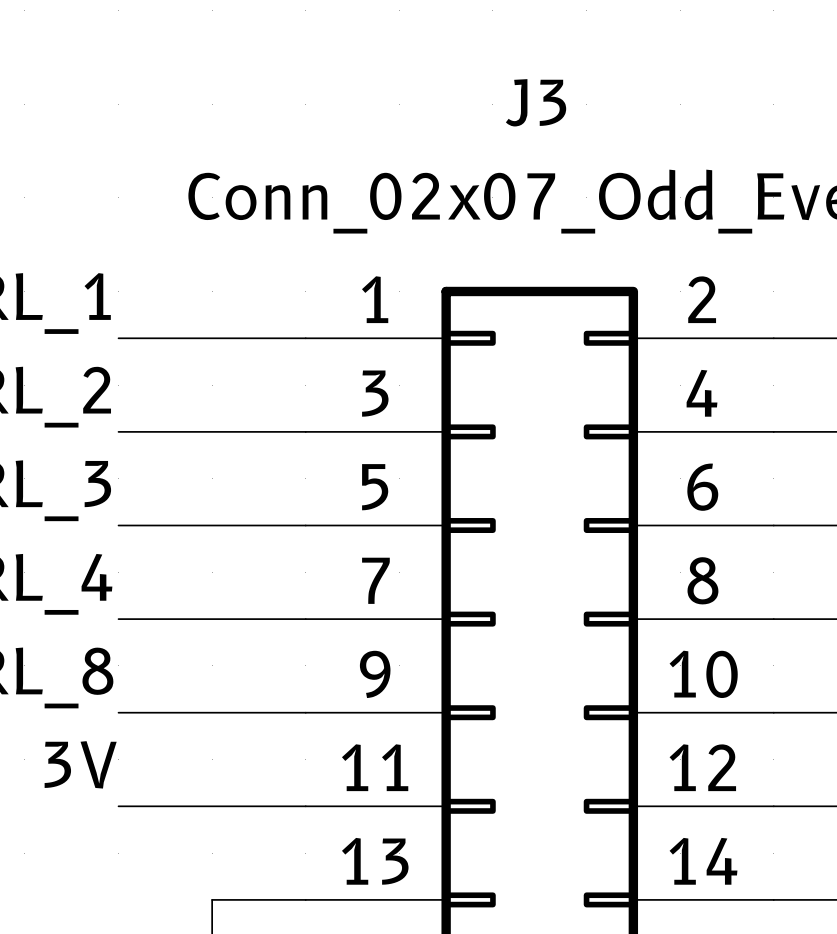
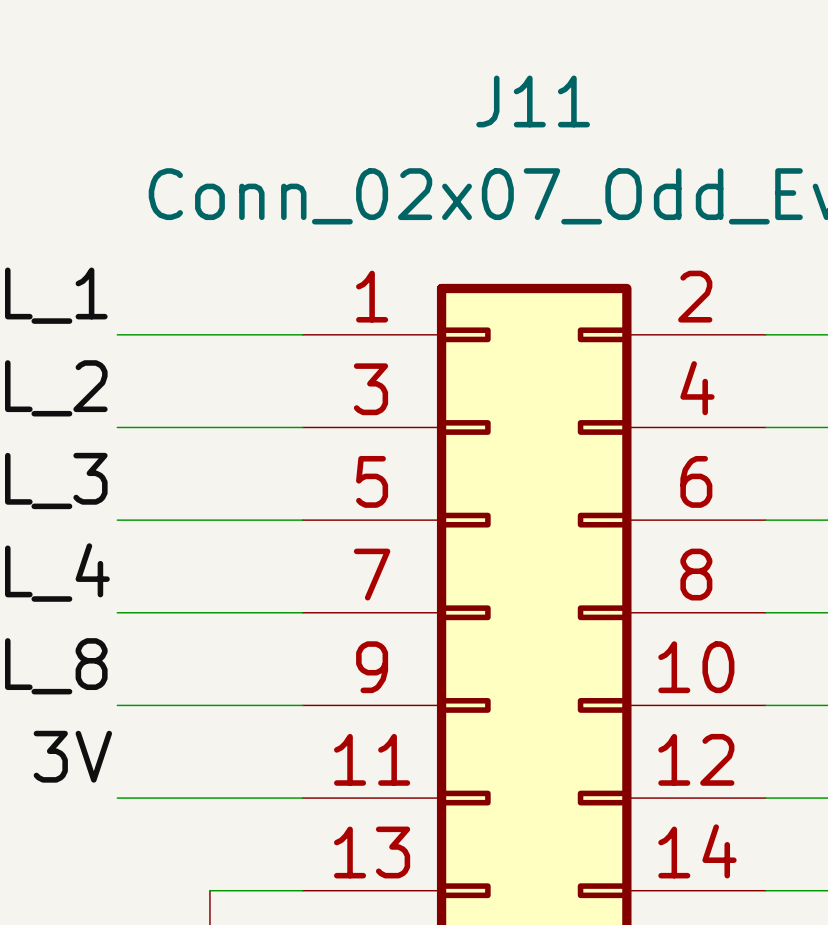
J3 name: J3 (536, 102) -> J11 (533, 101)

